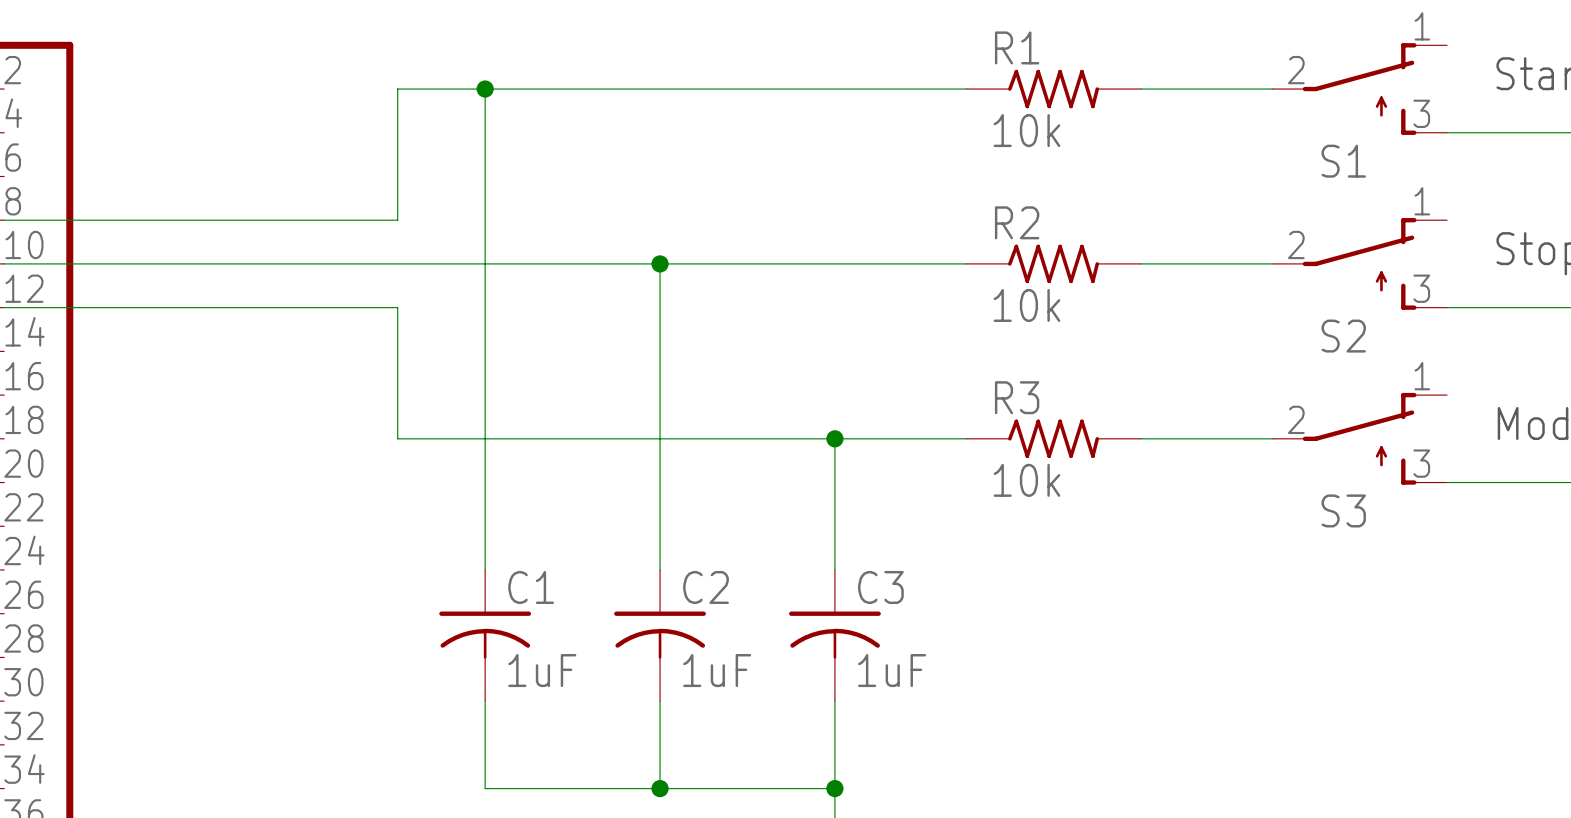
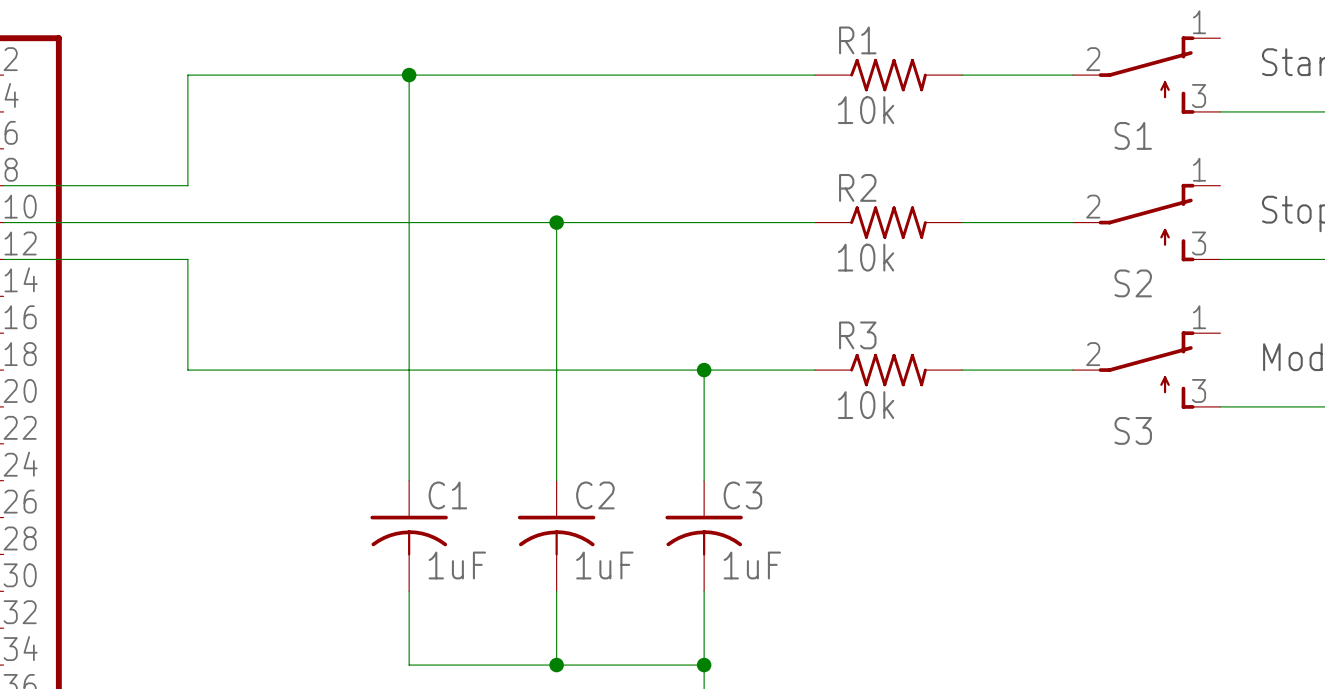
wire: (397, 89) (397, 220) (222, 220) -> (335, 75) (187, 75) (187, 185)
wire: (222, 307) (397, 307) (397, 438) -> (187, 259) (187, 370) (335, 370)

